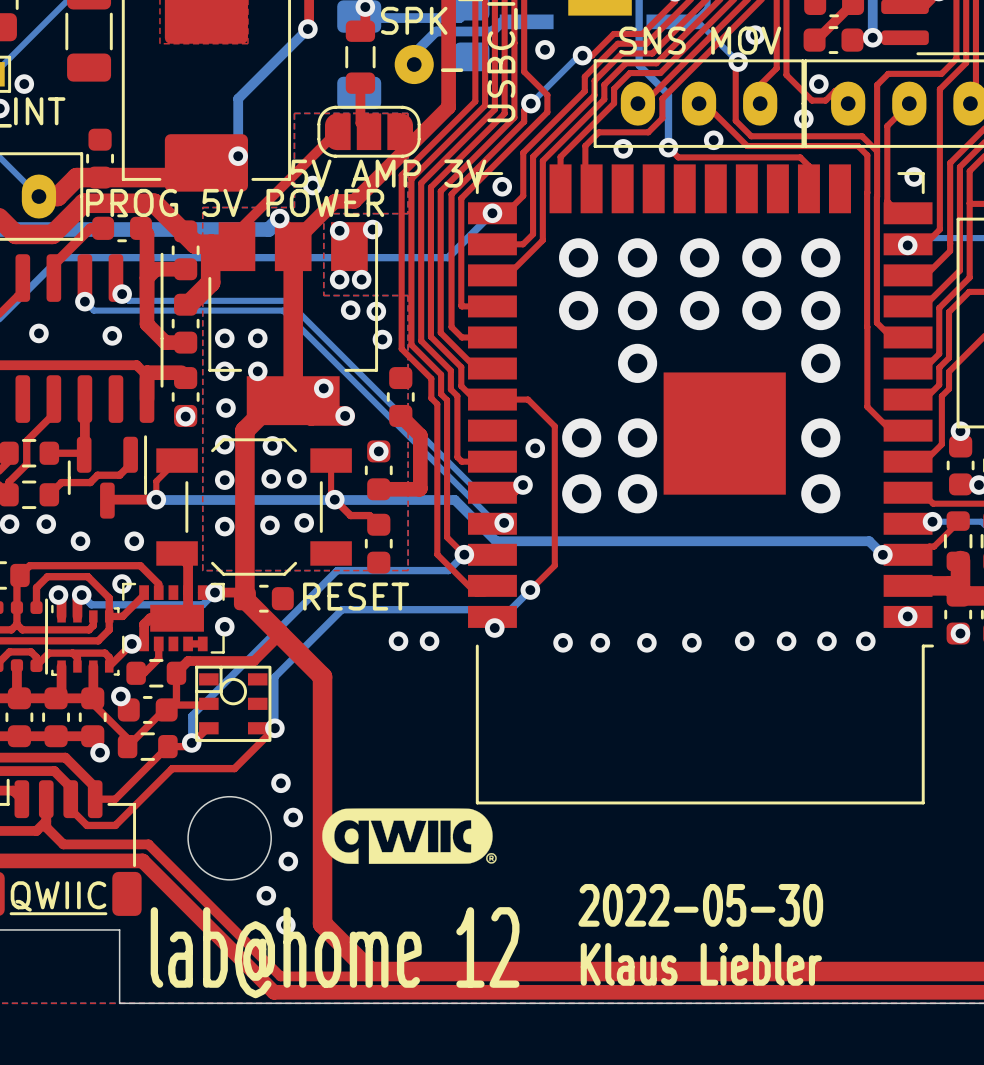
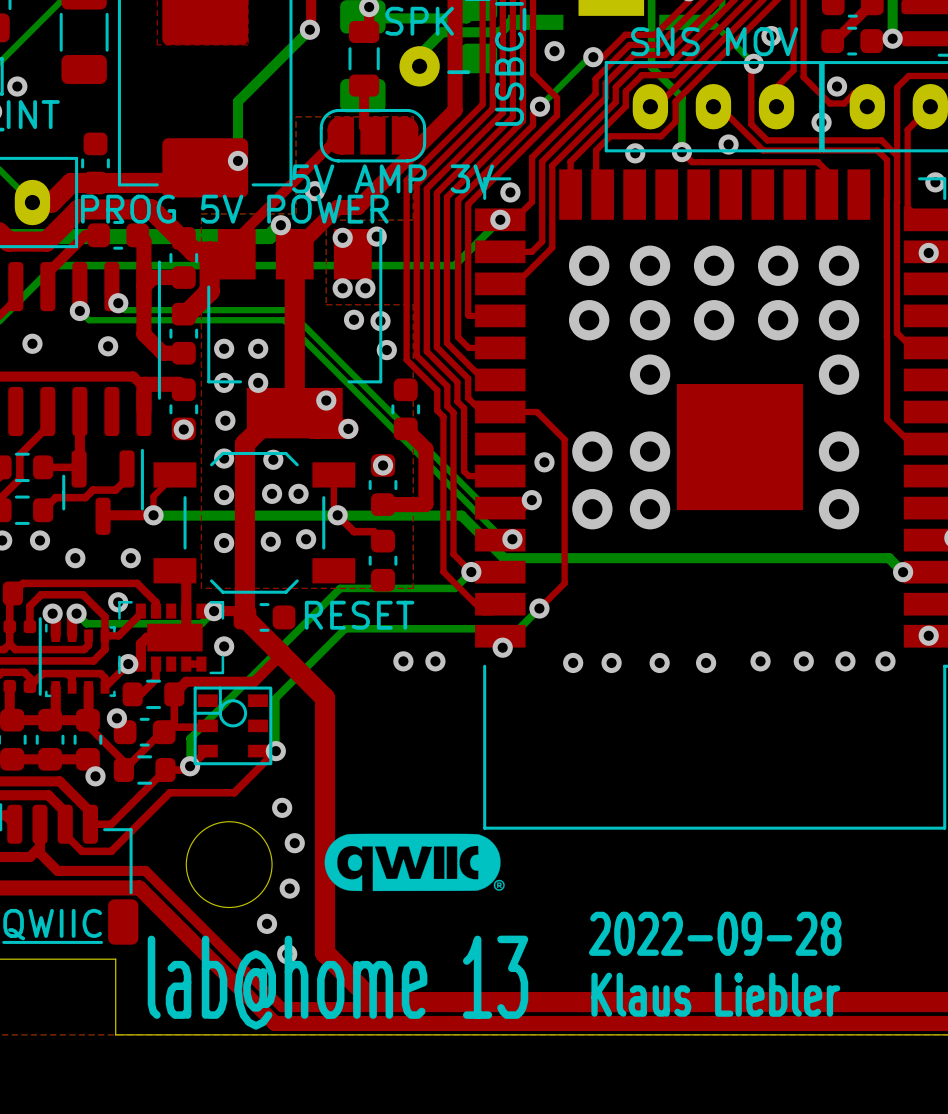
text: 2022-05-30 (700, 905) -> 2022-09-28 (715, 933)
text: lab@home 12 (335, 952) -> lab@home 13 (337, 982)

